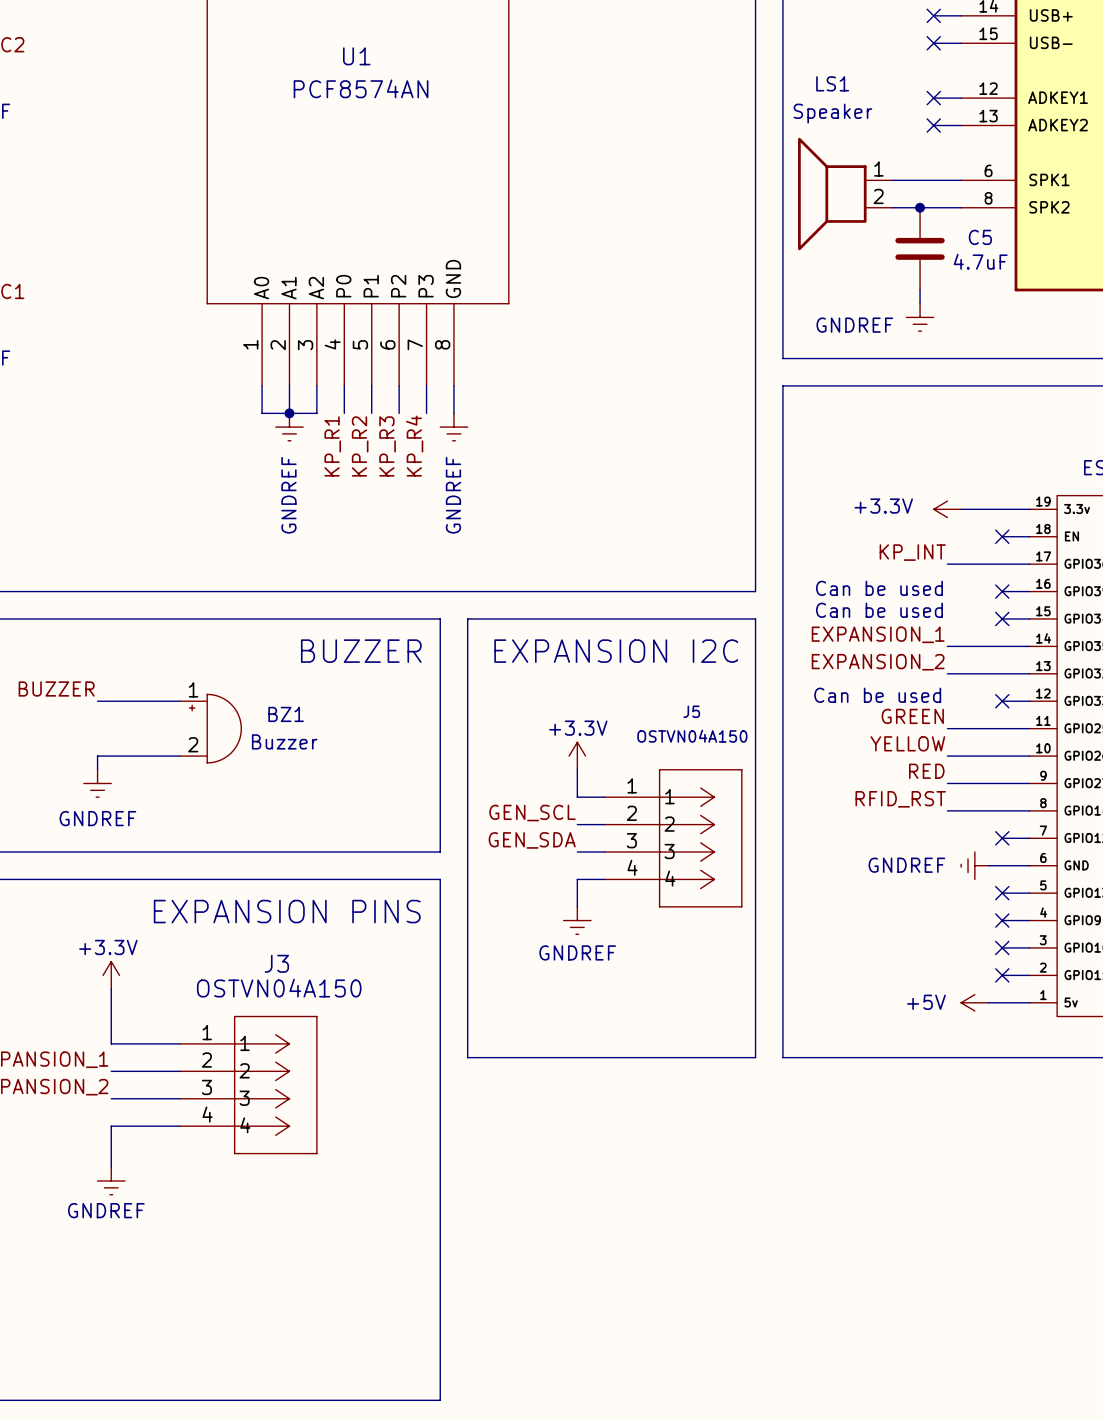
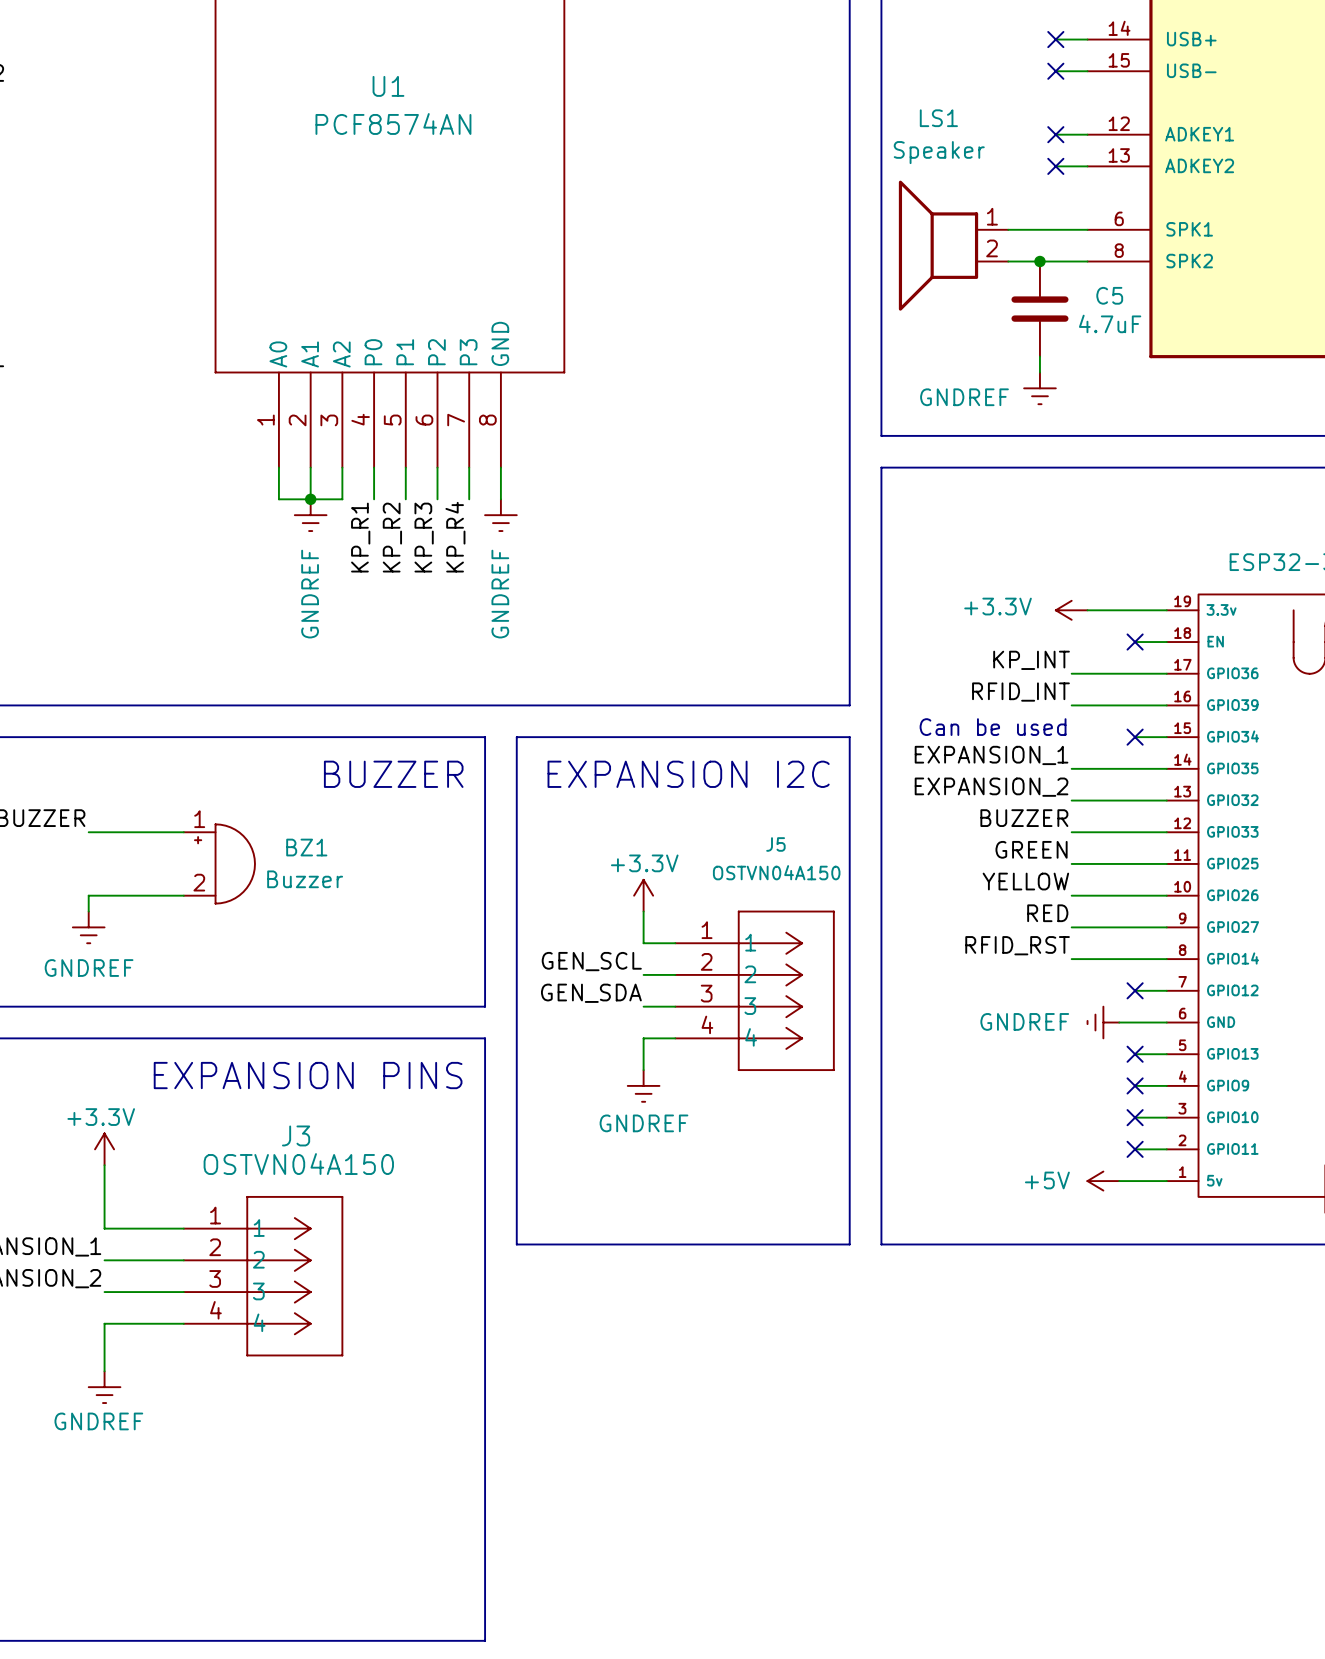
label: none -> RFID_INT (1020, 692)
text: Can be used (879, 588) -> none
wire: none -> (1071, 705) (1135, 705)
no-connect mark: (1002, 591) -> none
label: none -> BUZZER (1024, 818)
text: Can be used (877, 695) -> none
wire: none -> (1071, 832) (1135, 832)
no-connect mark: (1002, 701) -> none

